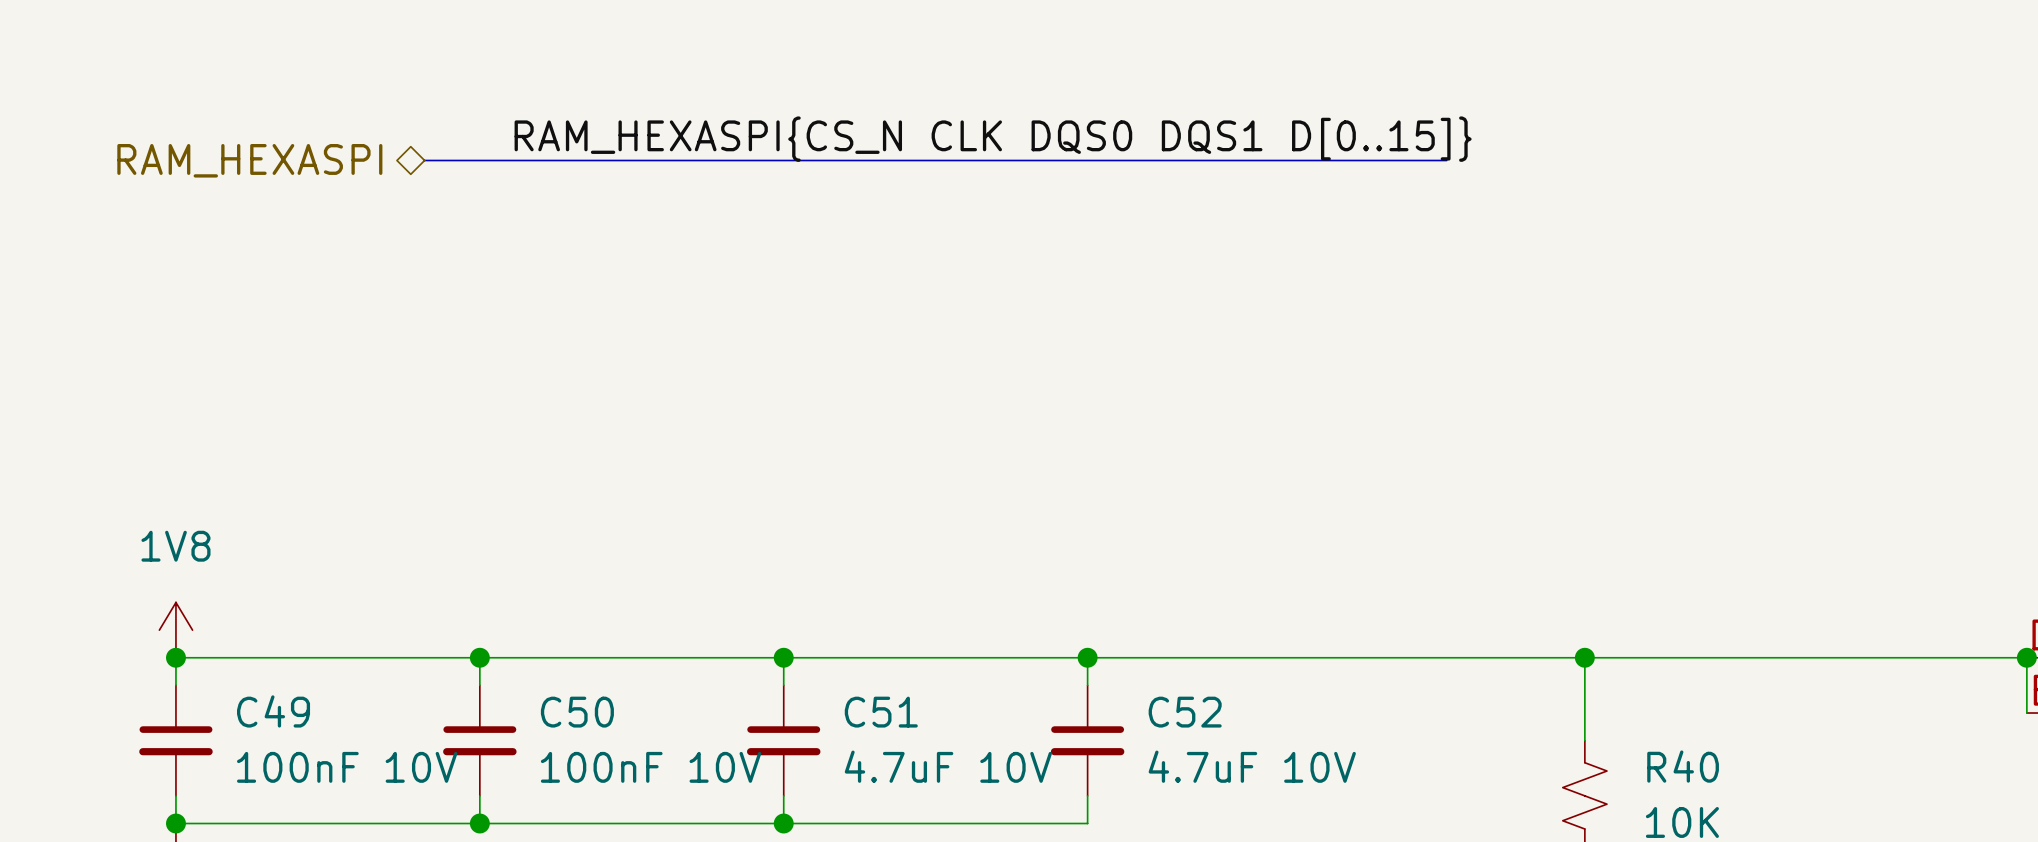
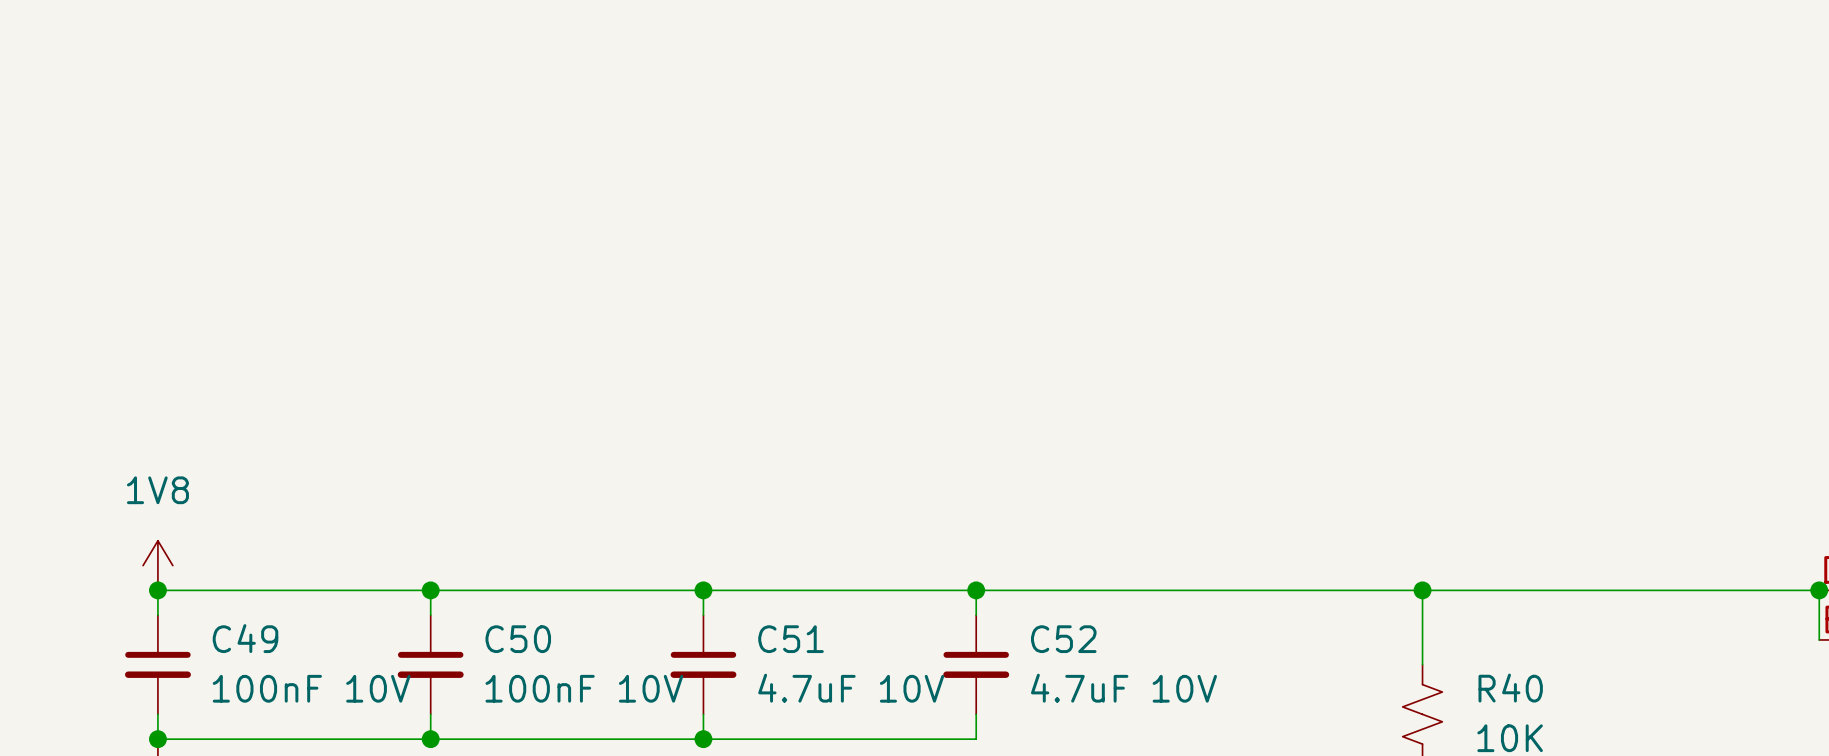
label: RAM_HEXASPI{CS_N CLK DQS0 DQS1 D[0..15]} (993, 139) -> none
hierarchical label: RAM_HEXASPI (249, 160) -> none
bus: (424, 160) (1446, 160) -> none

